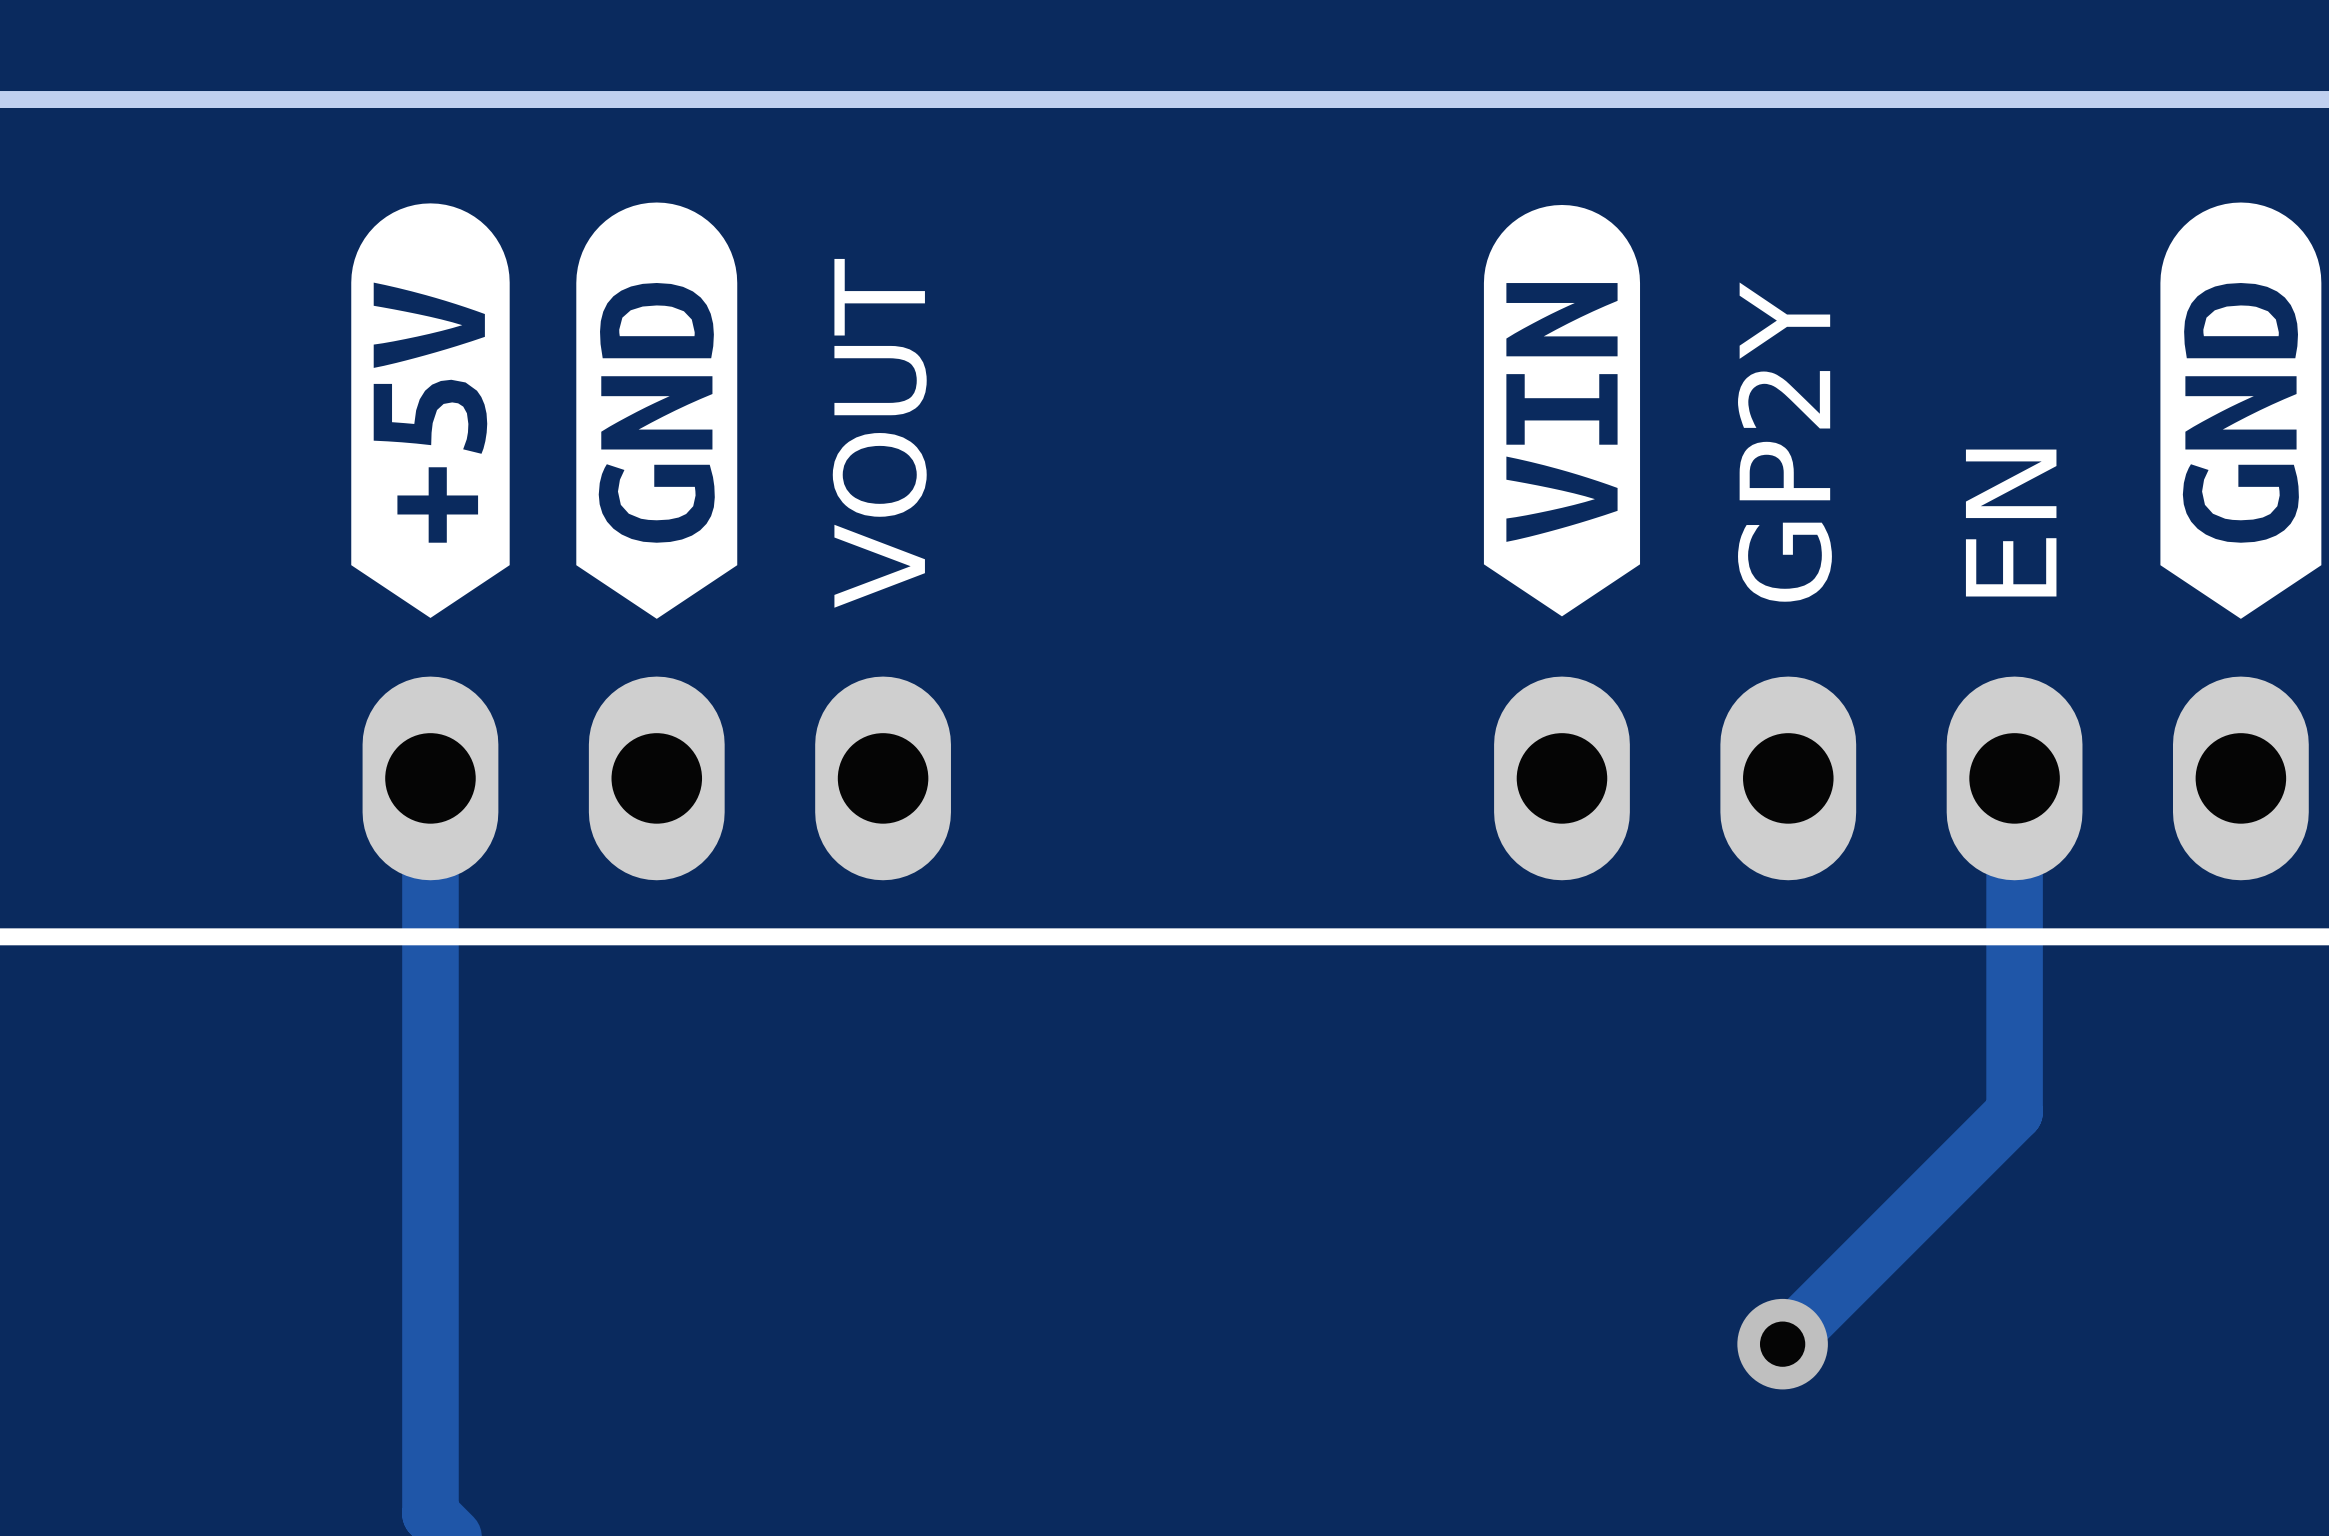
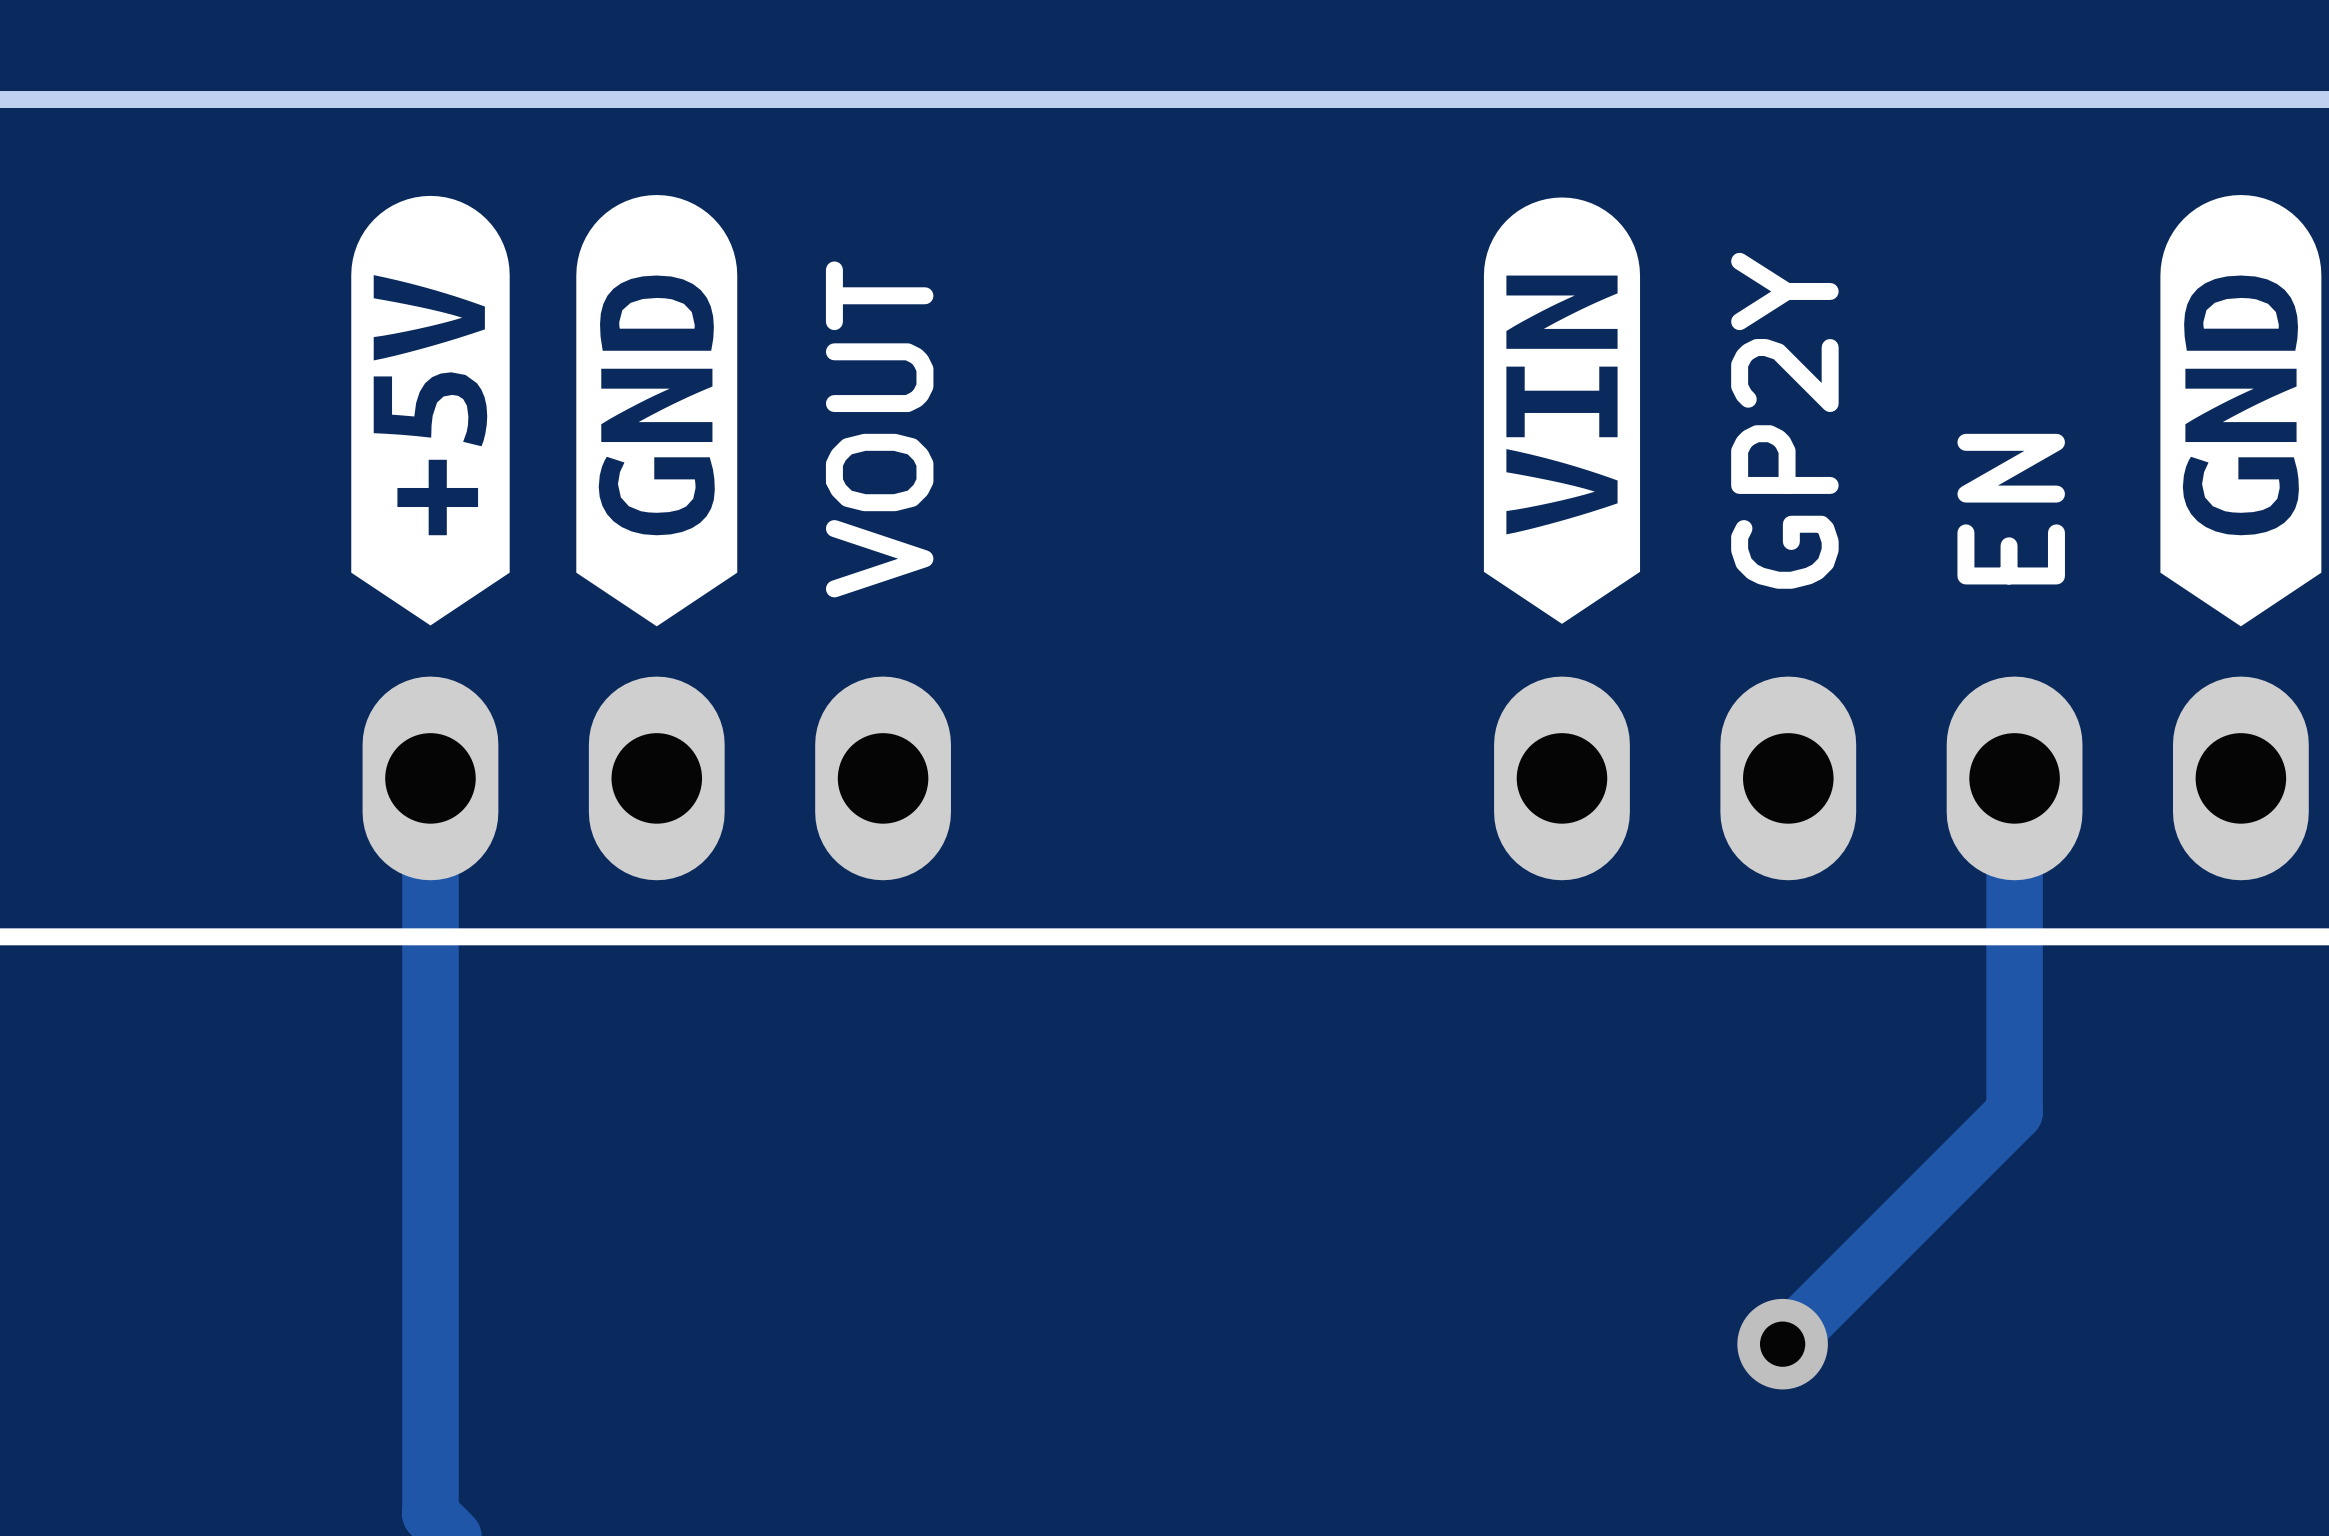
drawing shape: [576, 202, 738, 619] -> [576, 195, 738, 627]
drawing shape: [2160, 202, 2322, 619] -> [2160, 195, 2322, 627]
drawing shape: [351, 203, 510, 618] -> [351, 195, 510, 626]
drawing shape: [1483, 204, 1641, 617] -> [1483, 197, 1641, 624]

